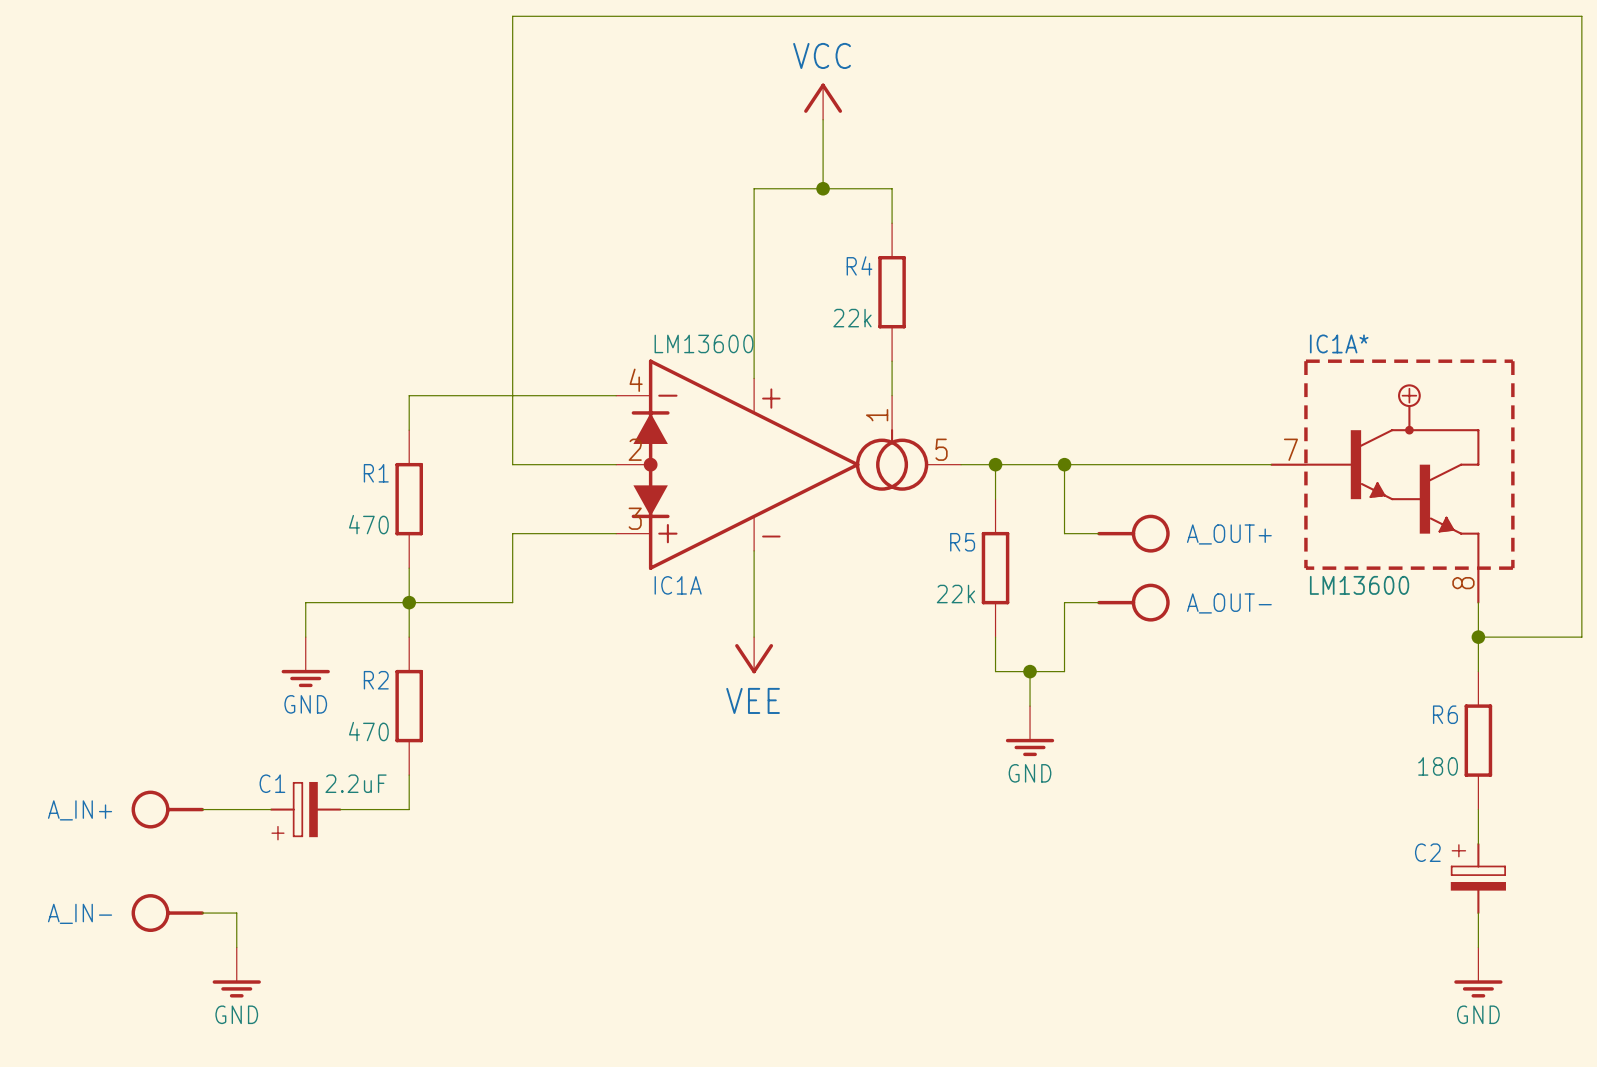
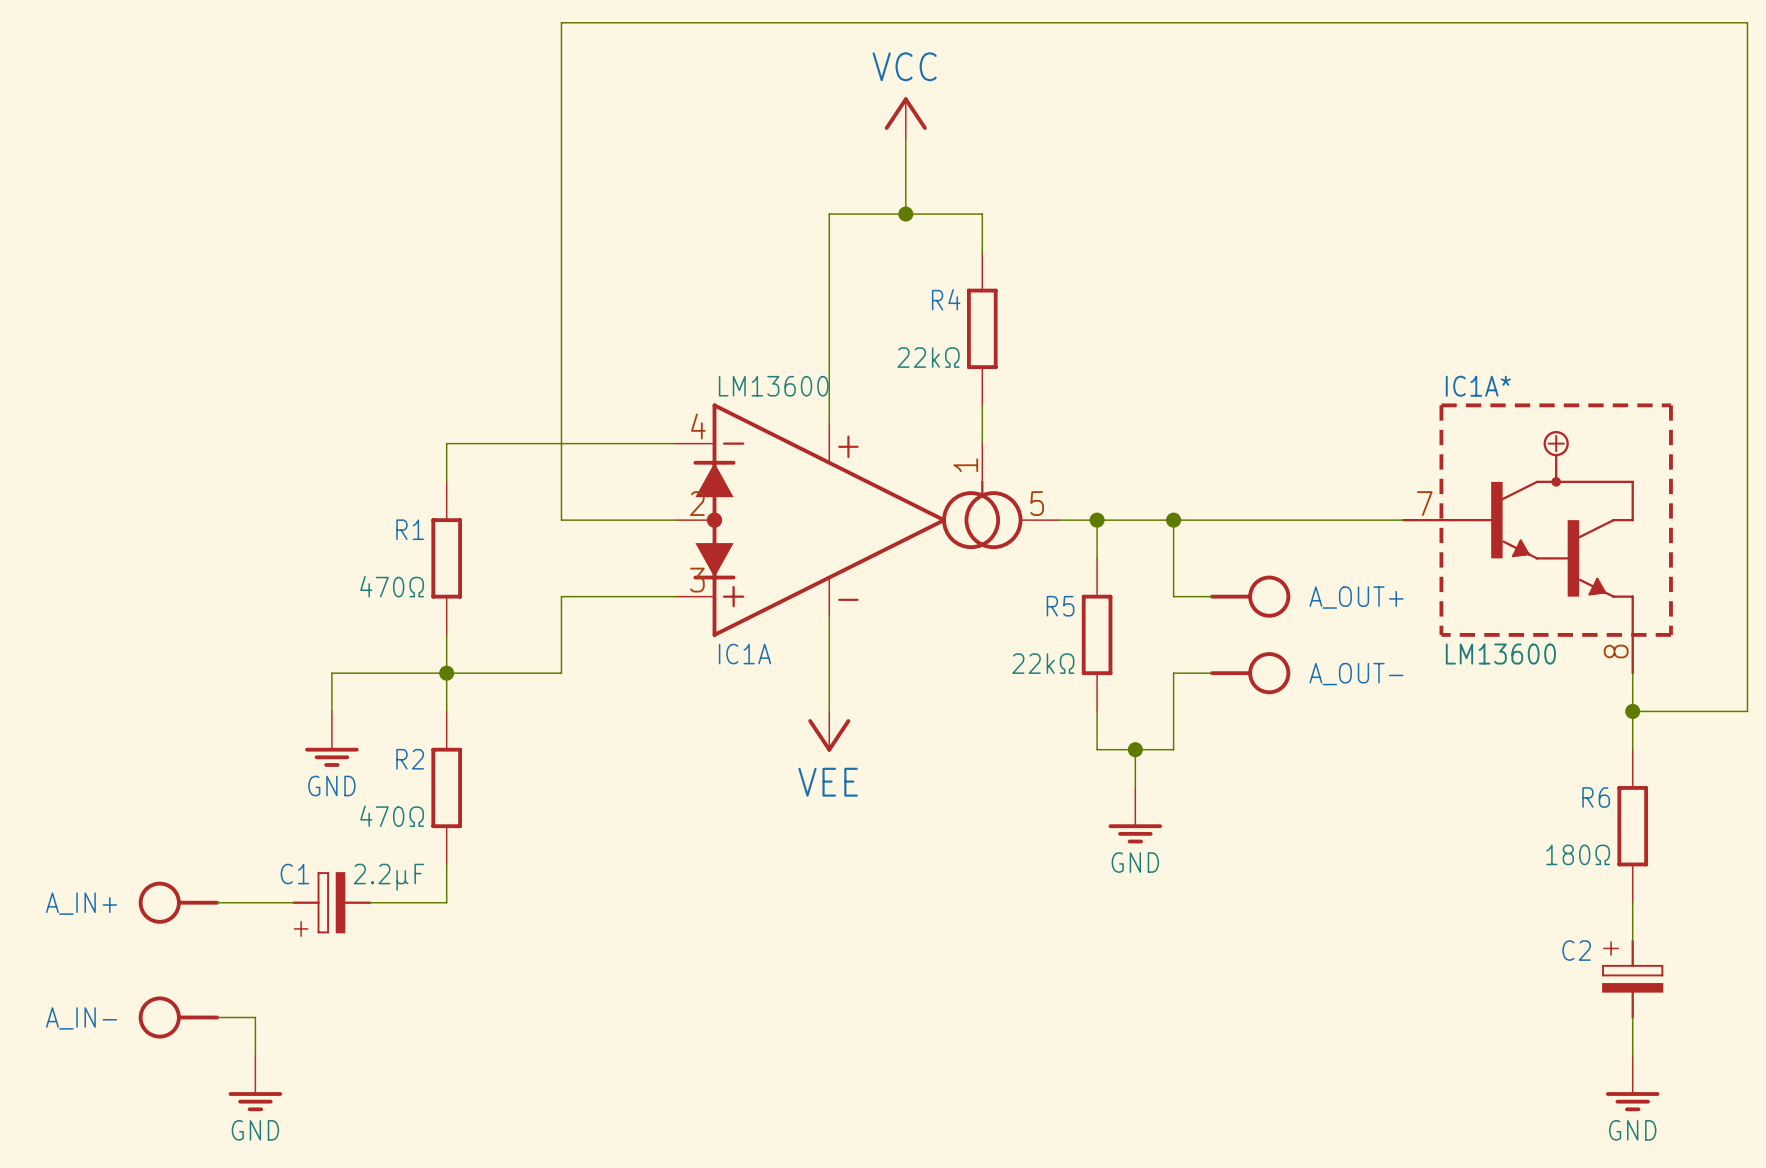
R4 value: 22k (852, 318) -> 22kΩ (928, 357)
R1 value: 470 (368, 524) -> 470Ω (392, 586)
R5 value: 22k (955, 594) -> 22kΩ (1043, 663)
R2 value: 470 (368, 731) -> 470Ω (392, 816)
R6 value: 180 (1438, 766) -> 180Ω (1578, 854)
C1 value: 2.2uF (356, 783) -> 2.2μF (388, 877)

